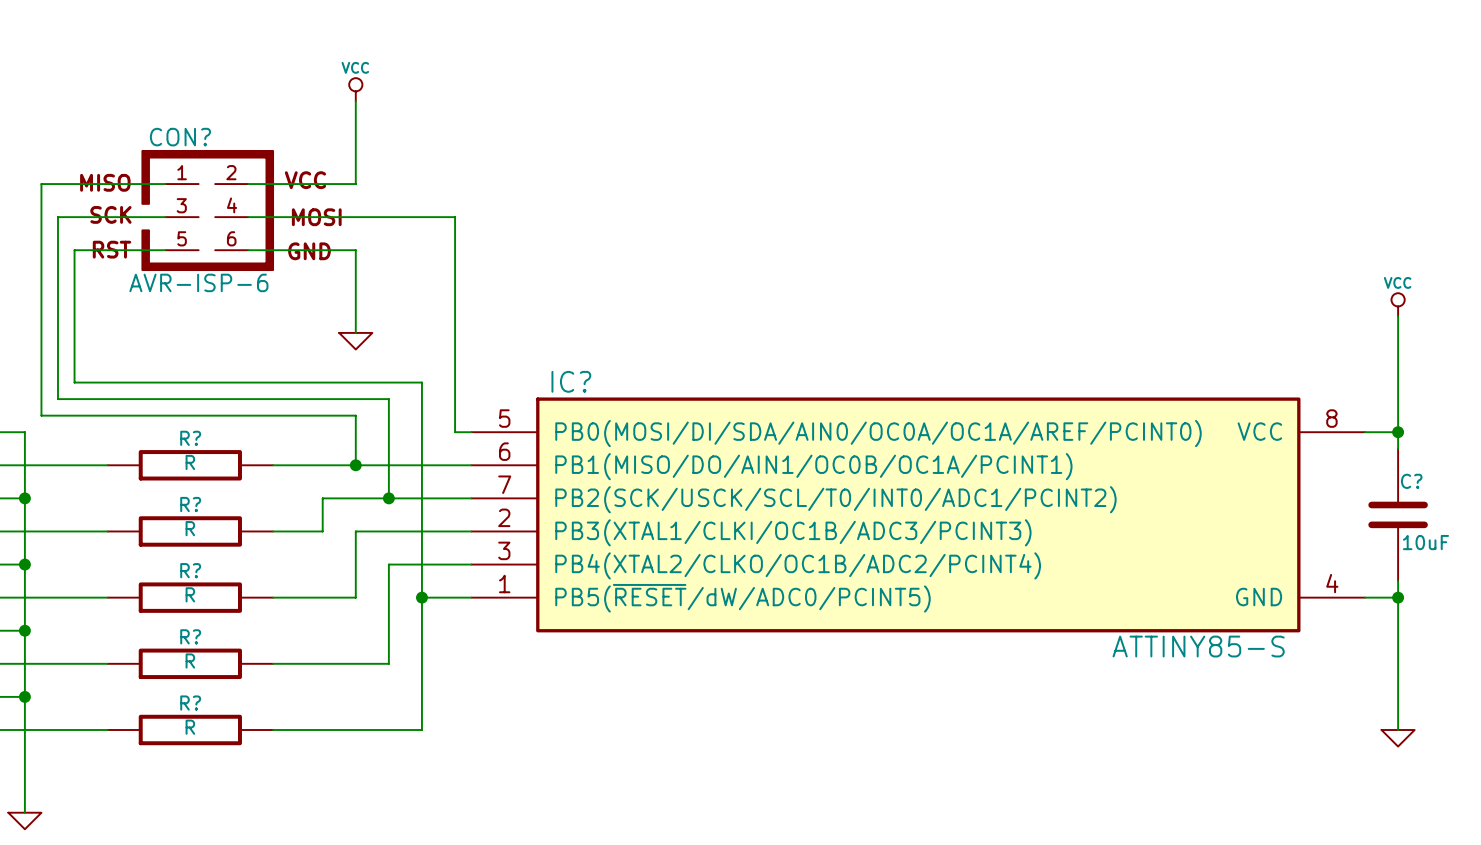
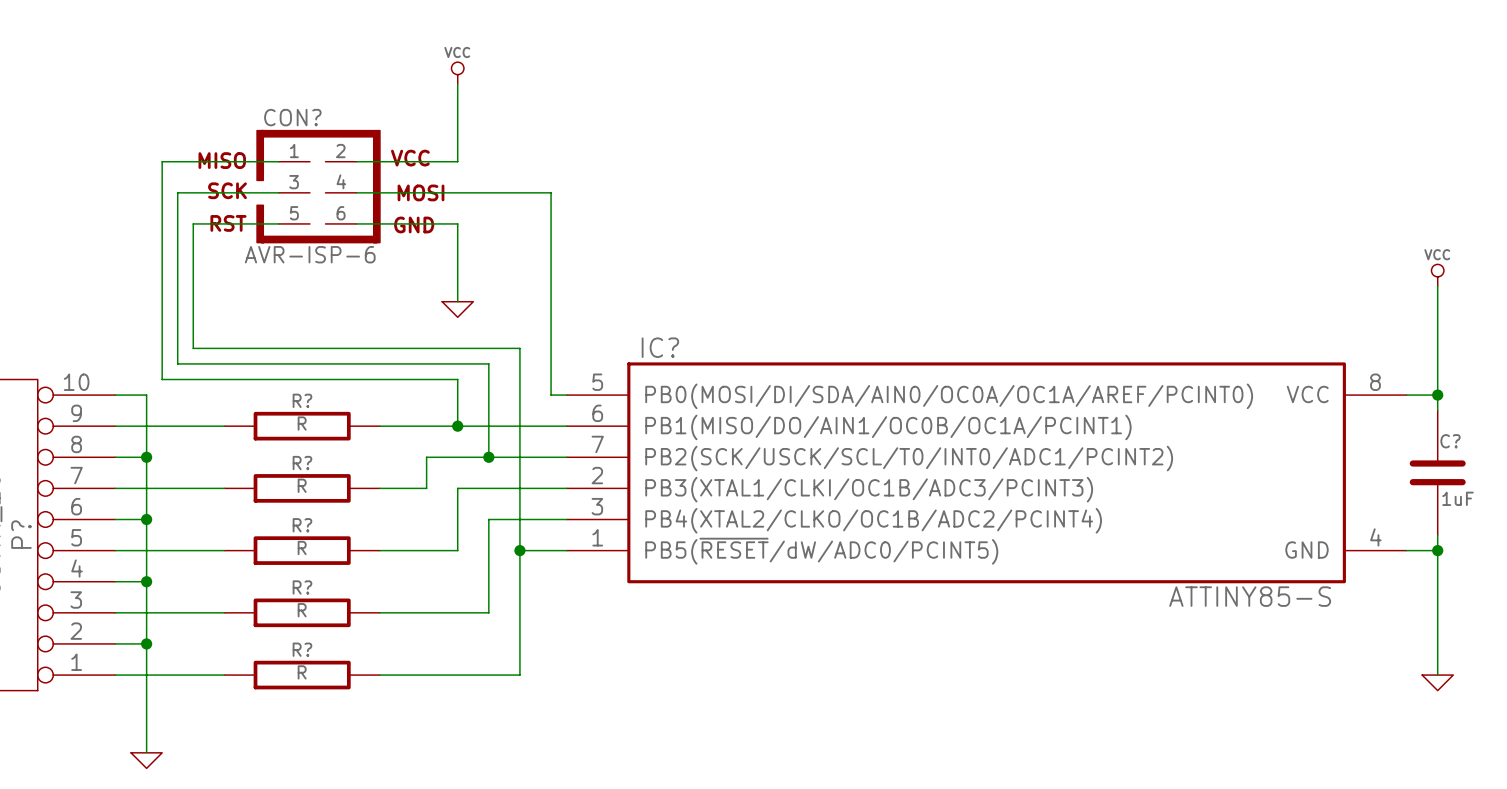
C? value: 10uF (1425, 542) -> 1uF (1457, 498)

